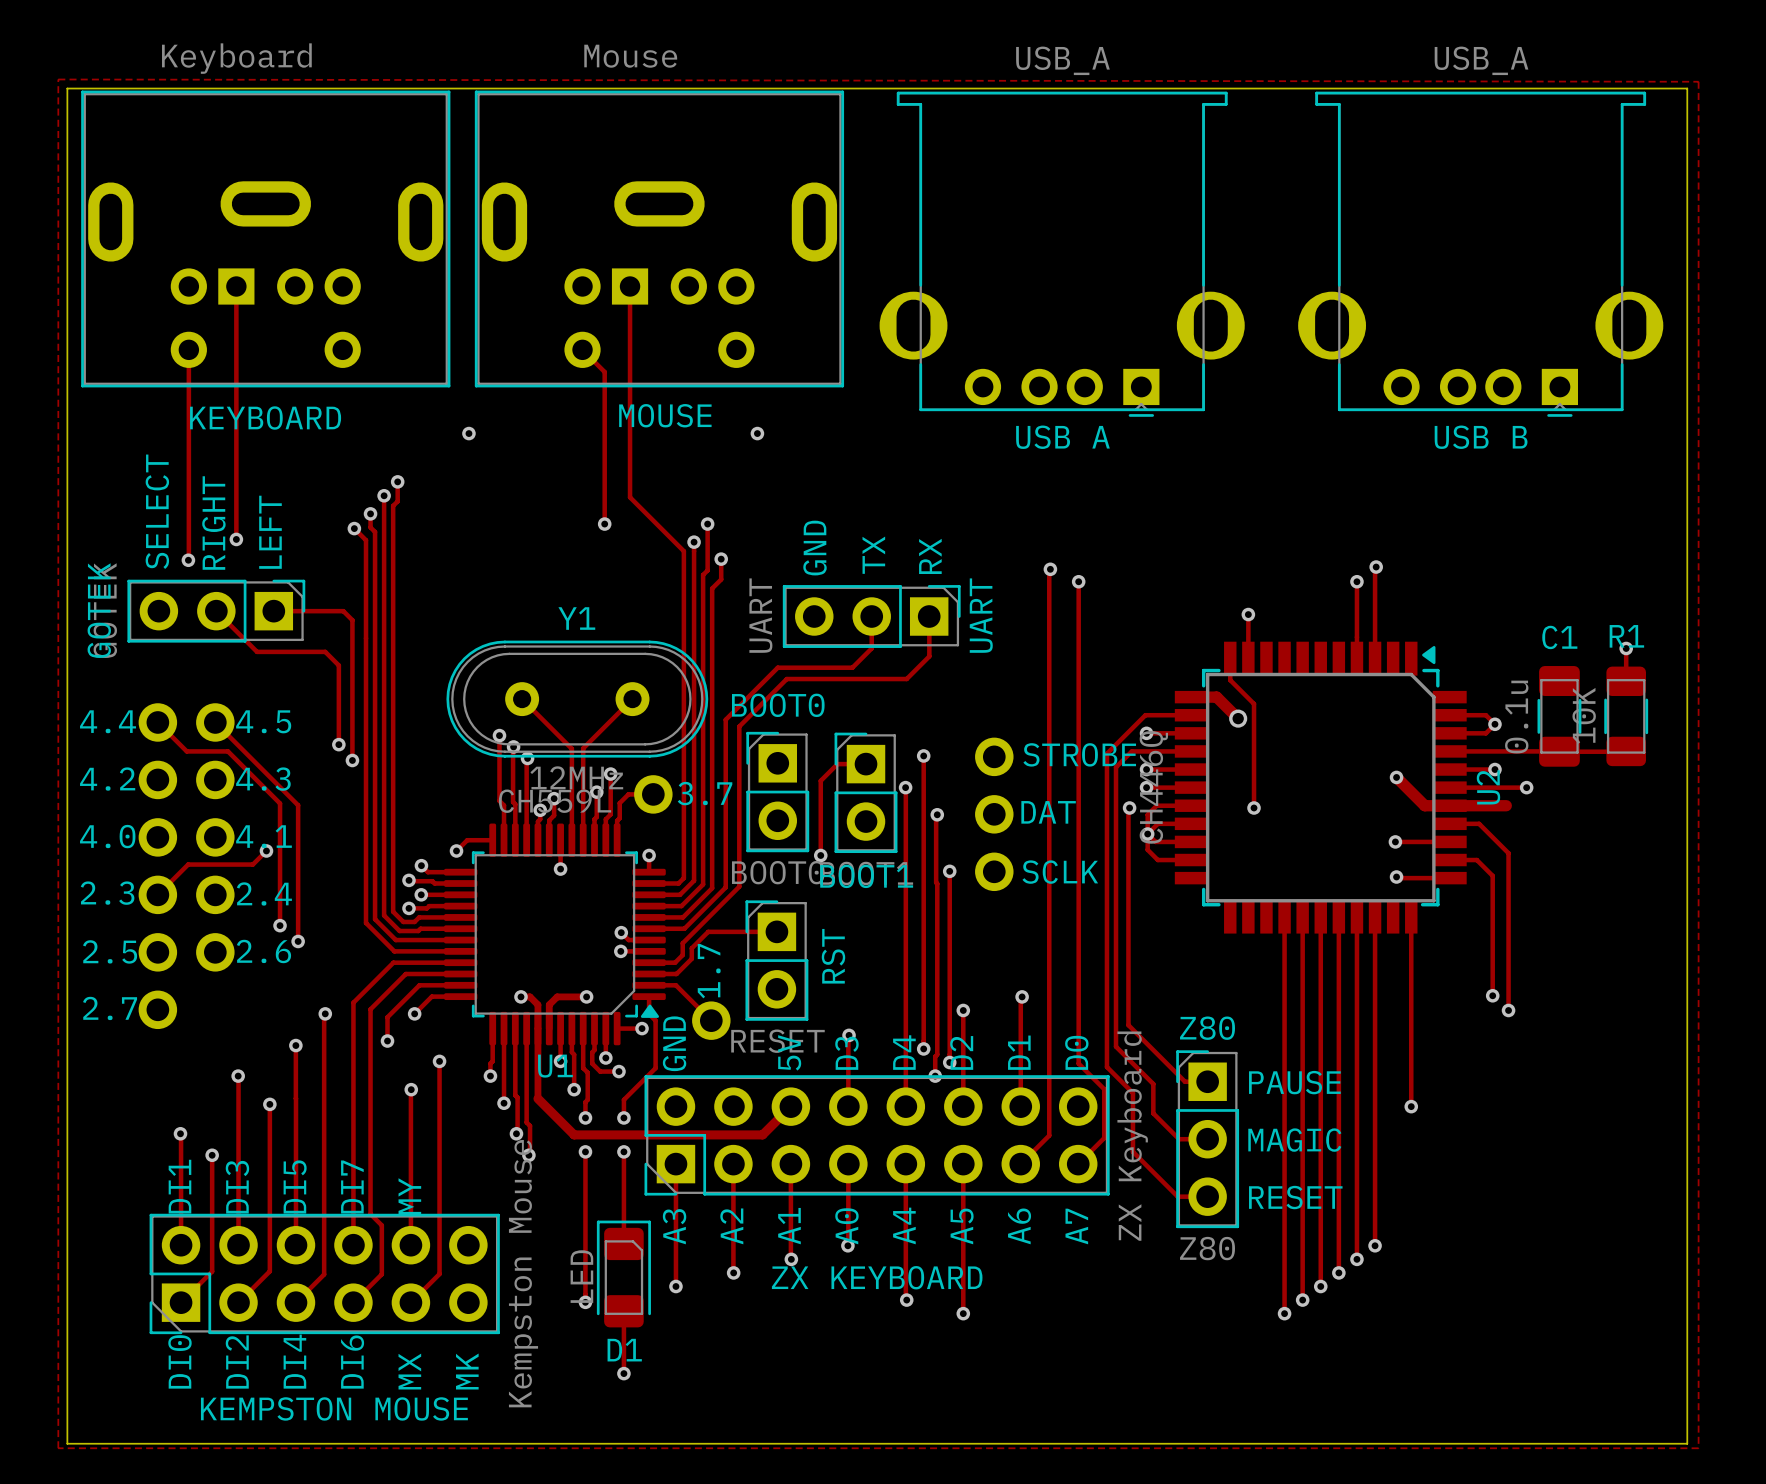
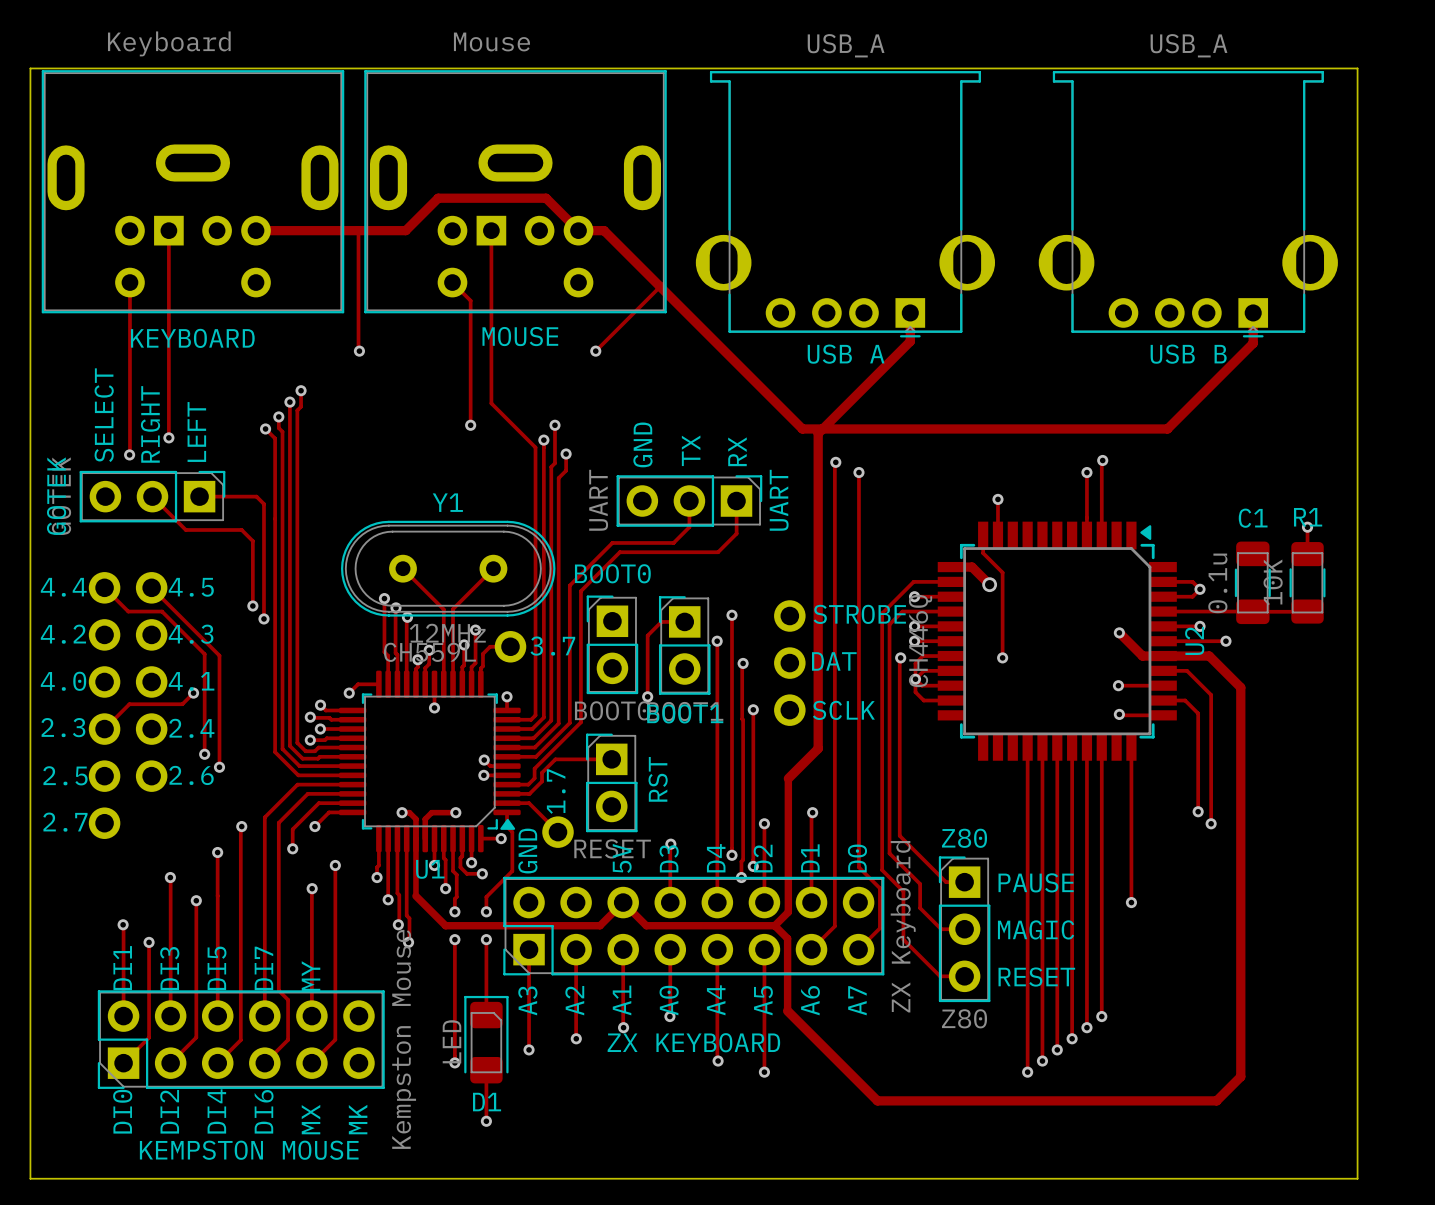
zone outline: (58, 79) (1698, 81) (1698, 1448) (58, 1448) (58, 79) -> none
track: none -> (256, 230) (405, 230) (438, 198) (546, 198) (578, 230) (604, 230) (802, 428) (1167, 428) (1253, 343) (1253, 312)
track: none -> (358, 230) (359, 351)
track: none -> (659, 286) (595, 351)
track: none -> (910, 312) (910, 341) (818, 433) (818, 748) (788, 778) (788, 912) (774, 925)
track: none -> (1209, 656) (1240, 687) (1240, 1076) (1216, 1100) (877, 1100) (787, 1010) (787, 938) (774, 925)
track: none -> (623, 902) (646, 925) (774, 925)

